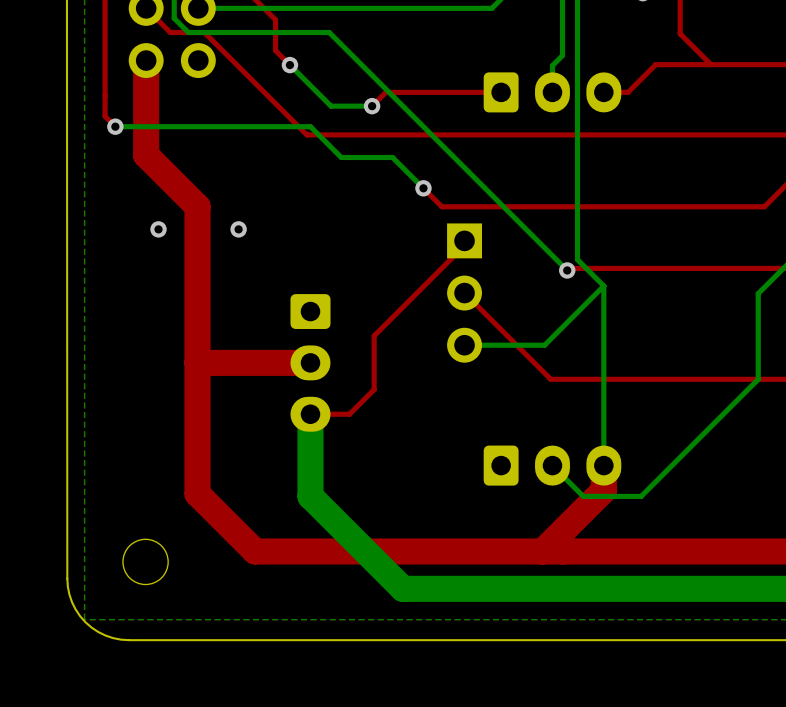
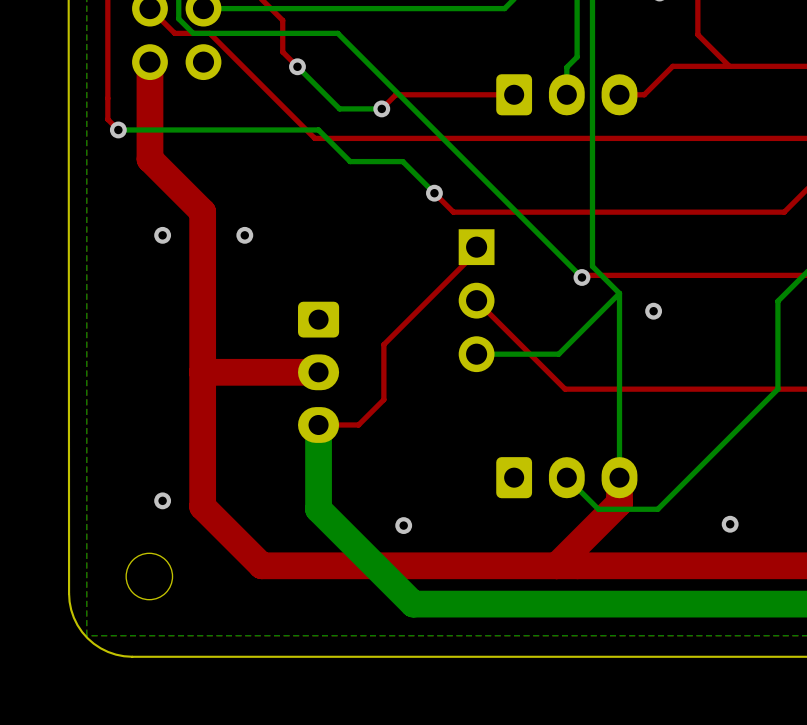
via: none -> (653, 311)
via: none -> (162, 500)
via: none -> (730, 524)
via: none -> (403, 525)

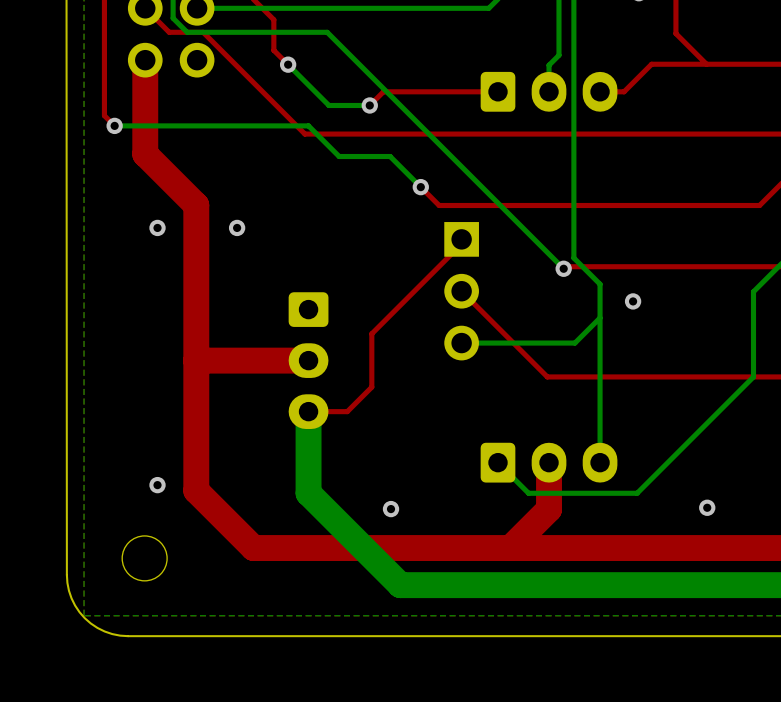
bottom track: (619, 293) (558, 354) -> (600, 317) (574, 343) (541, 343)
top track: none -> (549, 462) (549, 509) (510, 548)
bottom track: (566, 477) (598, 509) -> (498, 462) (528, 493) (579, 493)
top track: (619, 477) (619, 502) (556, 565) -> none

